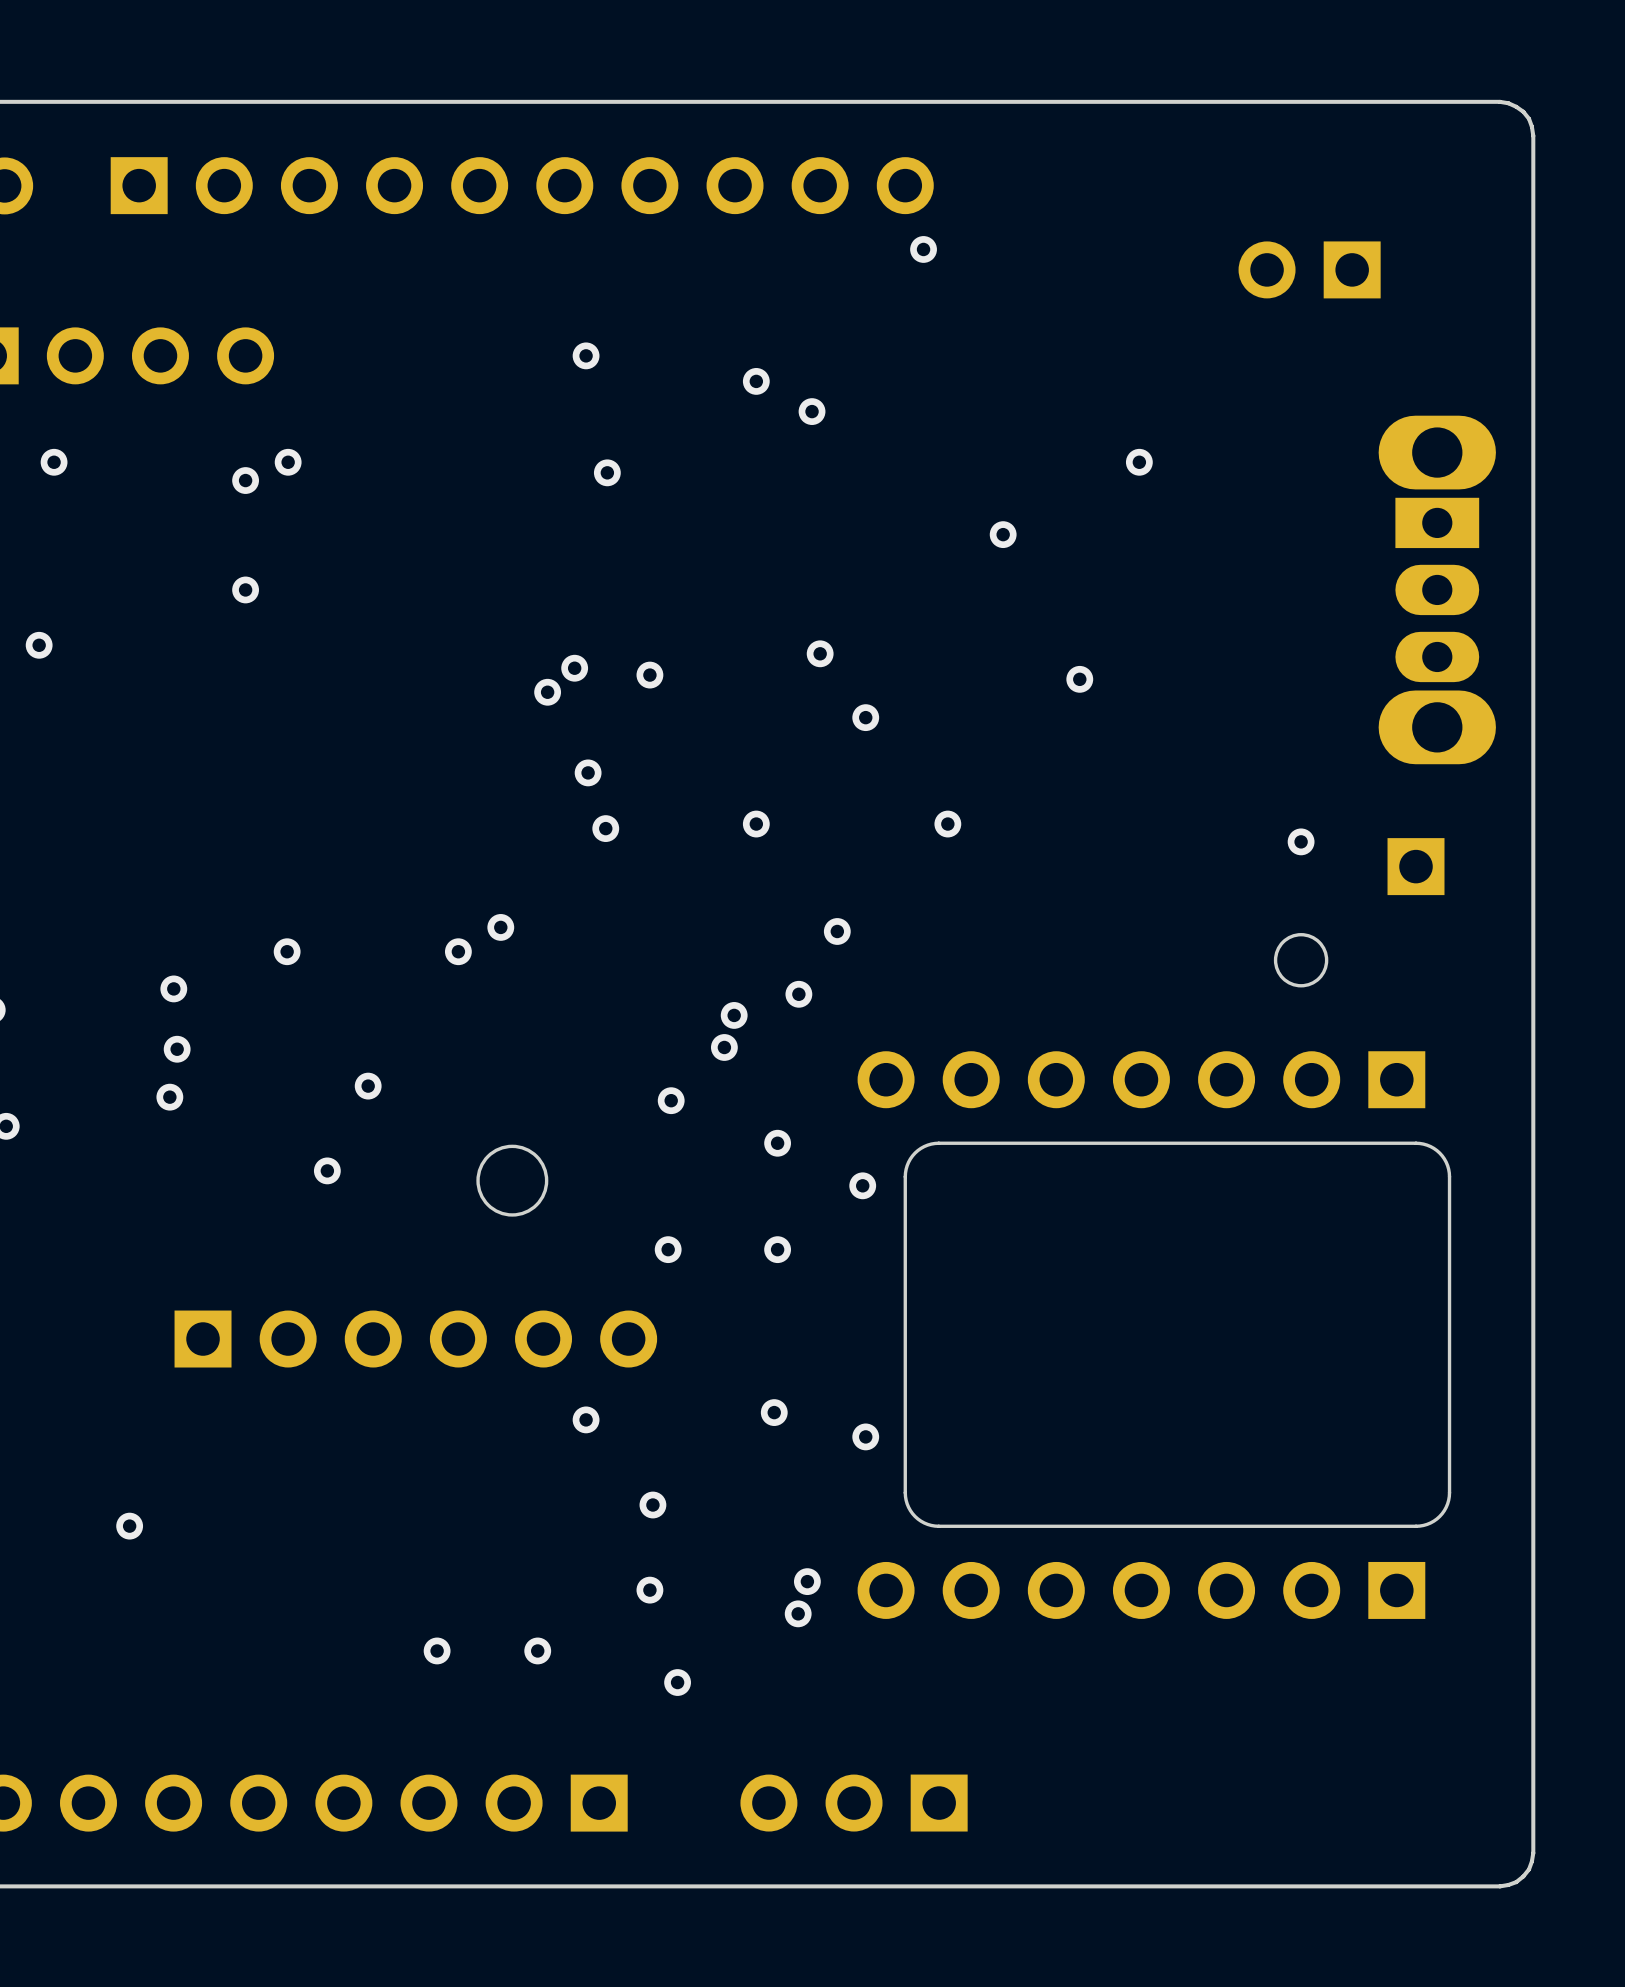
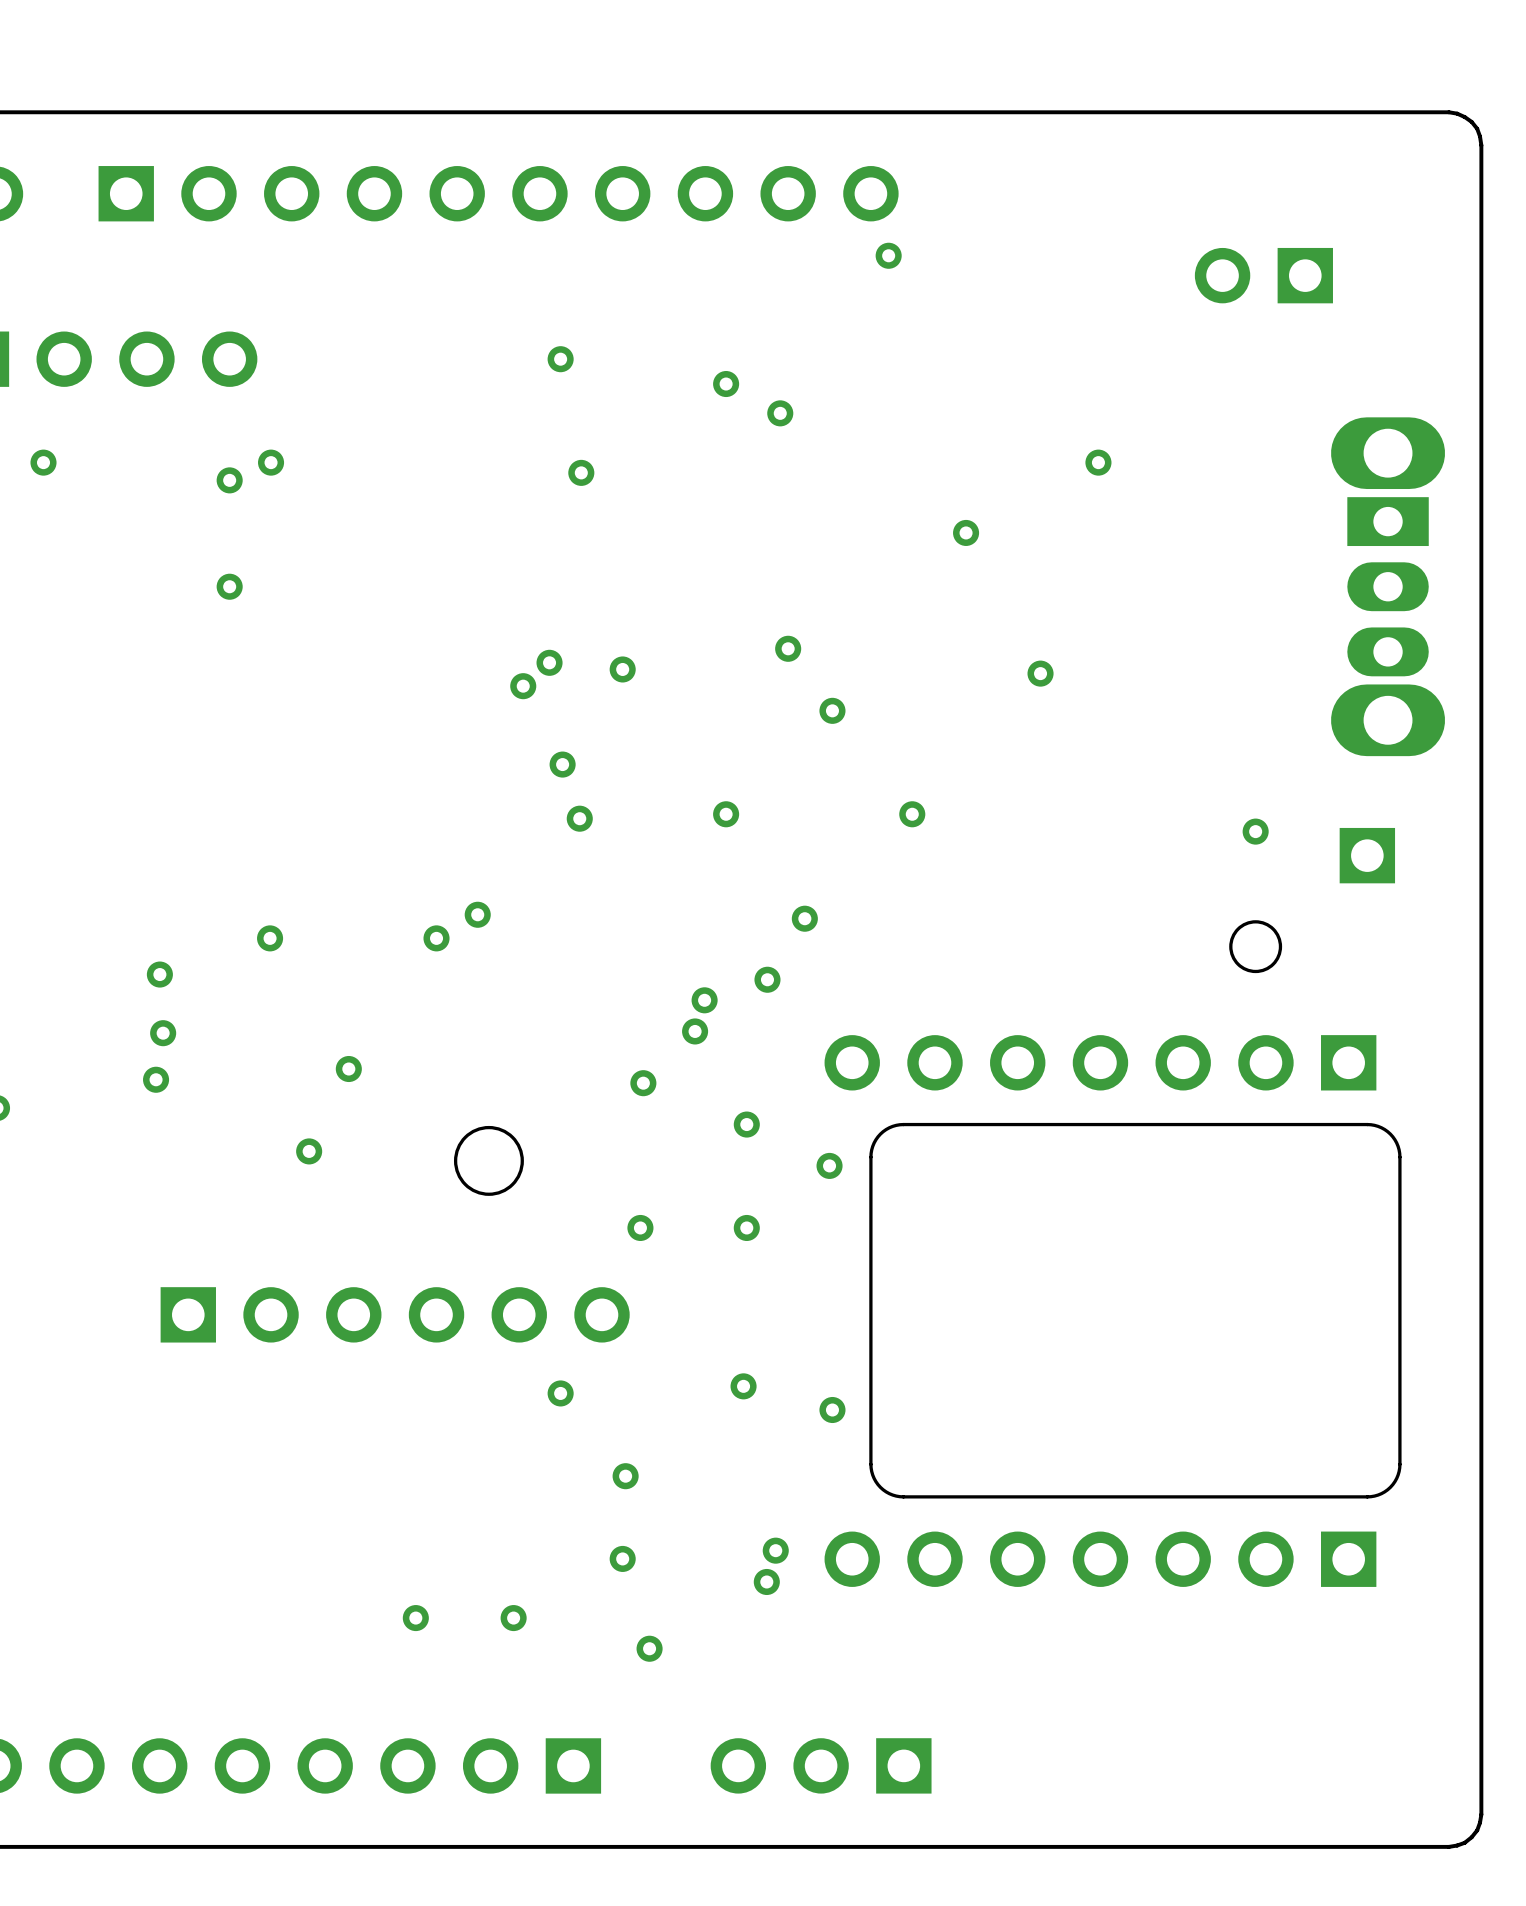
via: (39, 645) -> none
via: (129, 1526) -> none

